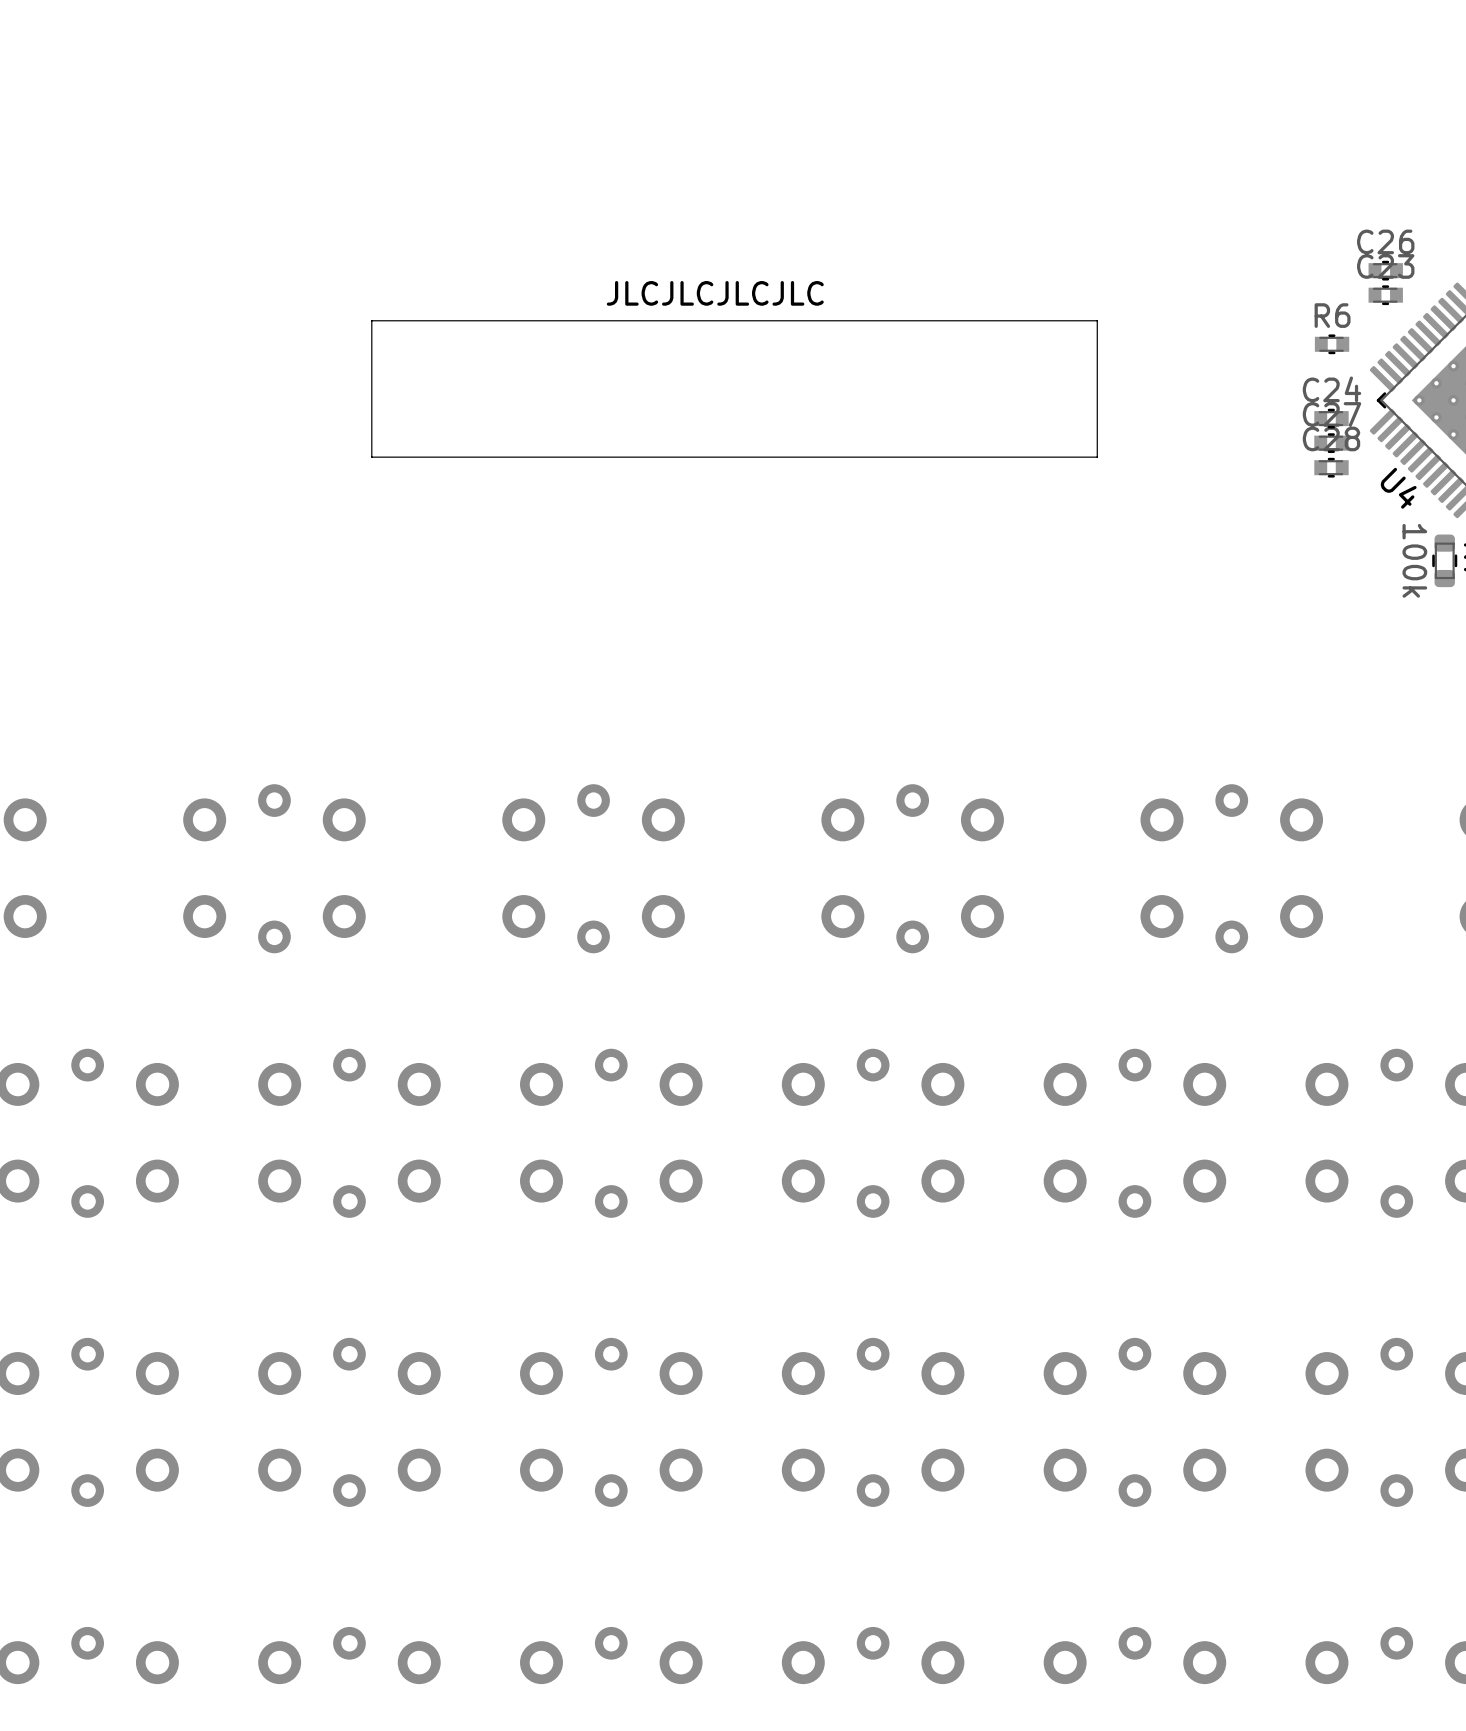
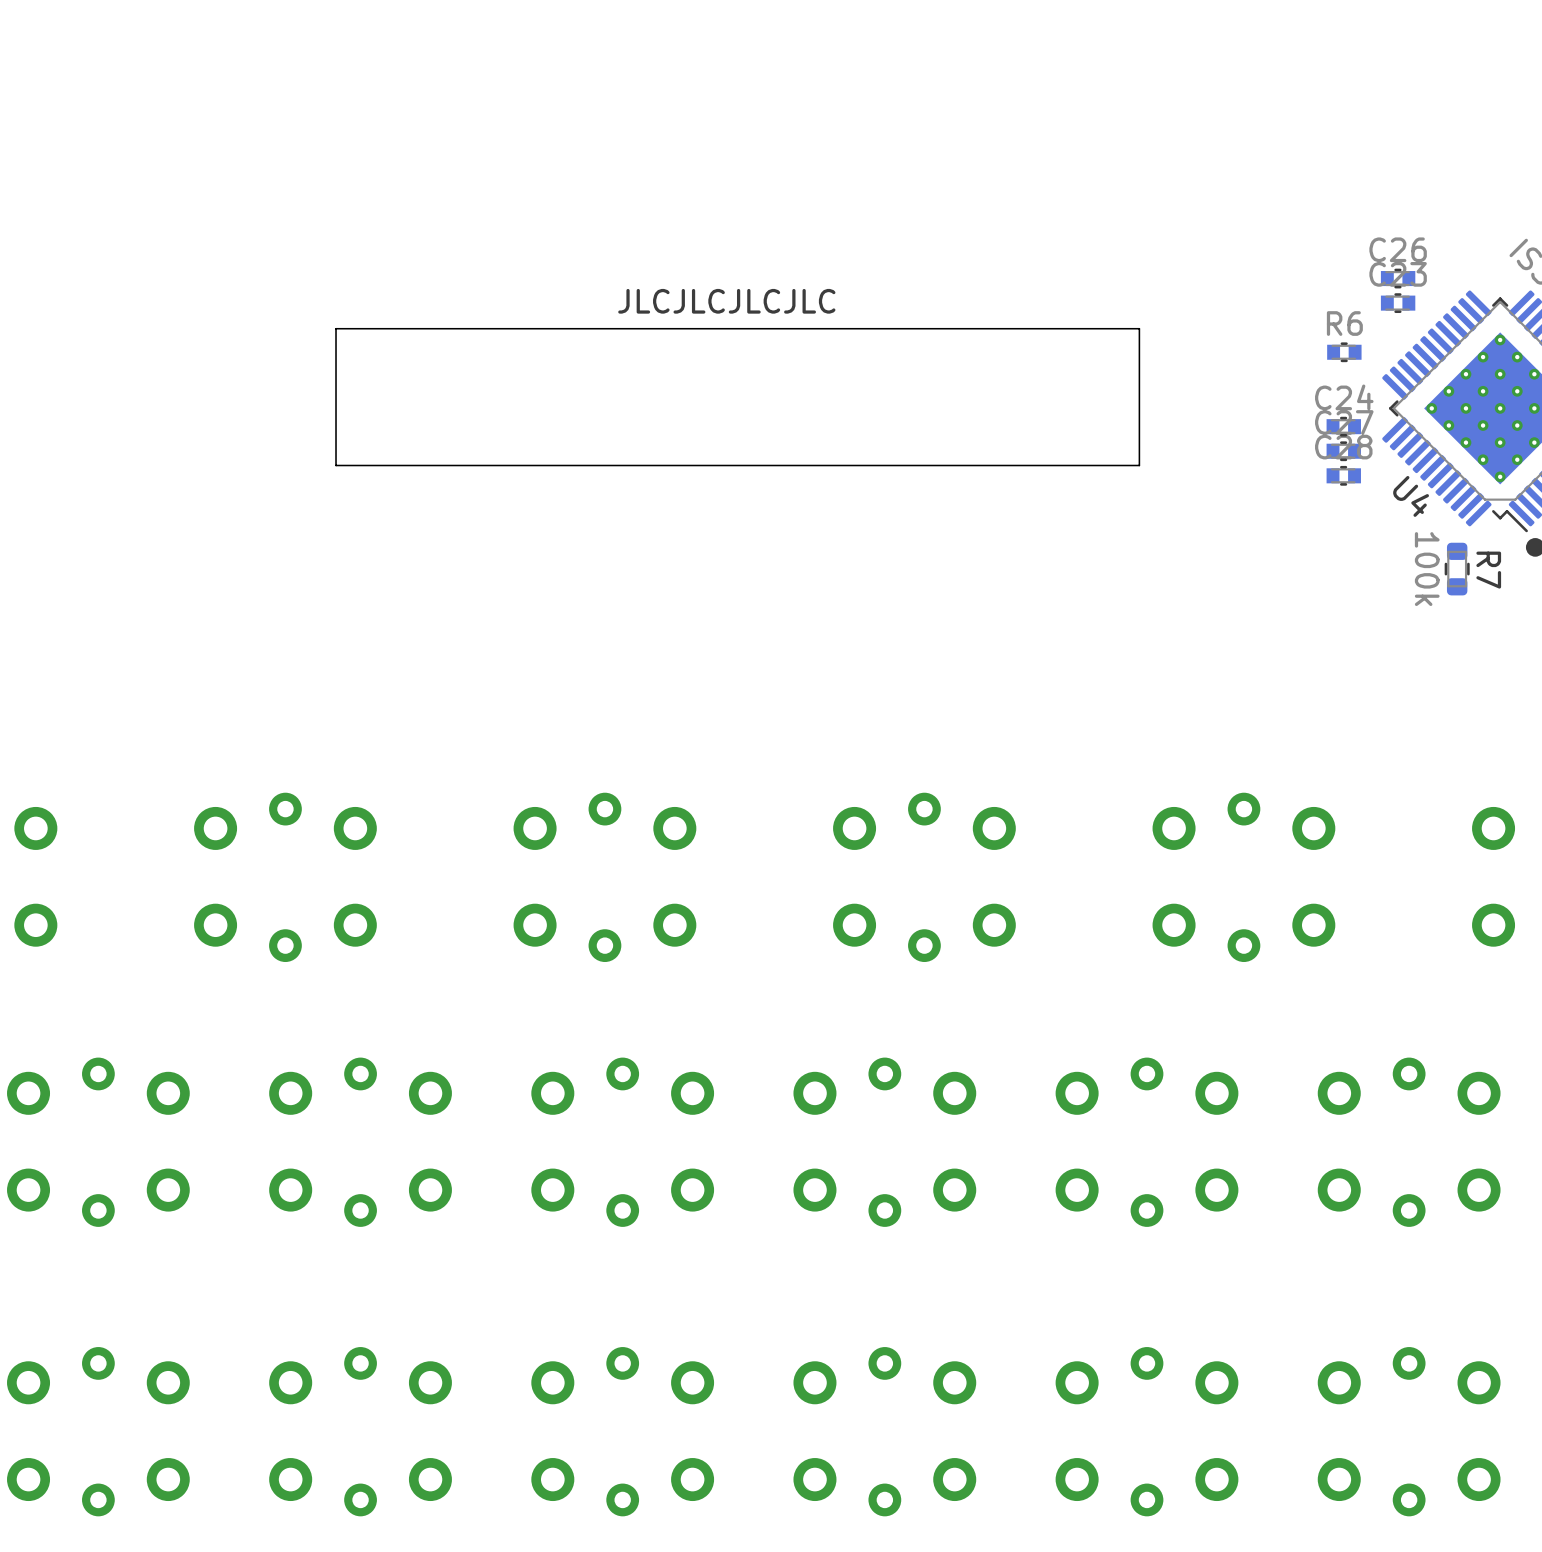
board edge: (1097, 320) (1097, 457) (371, 457) (371, 320) -> (1109, 328) (1139, 328) (1139, 465) (336, 465) (336, 328) (382, 328)

